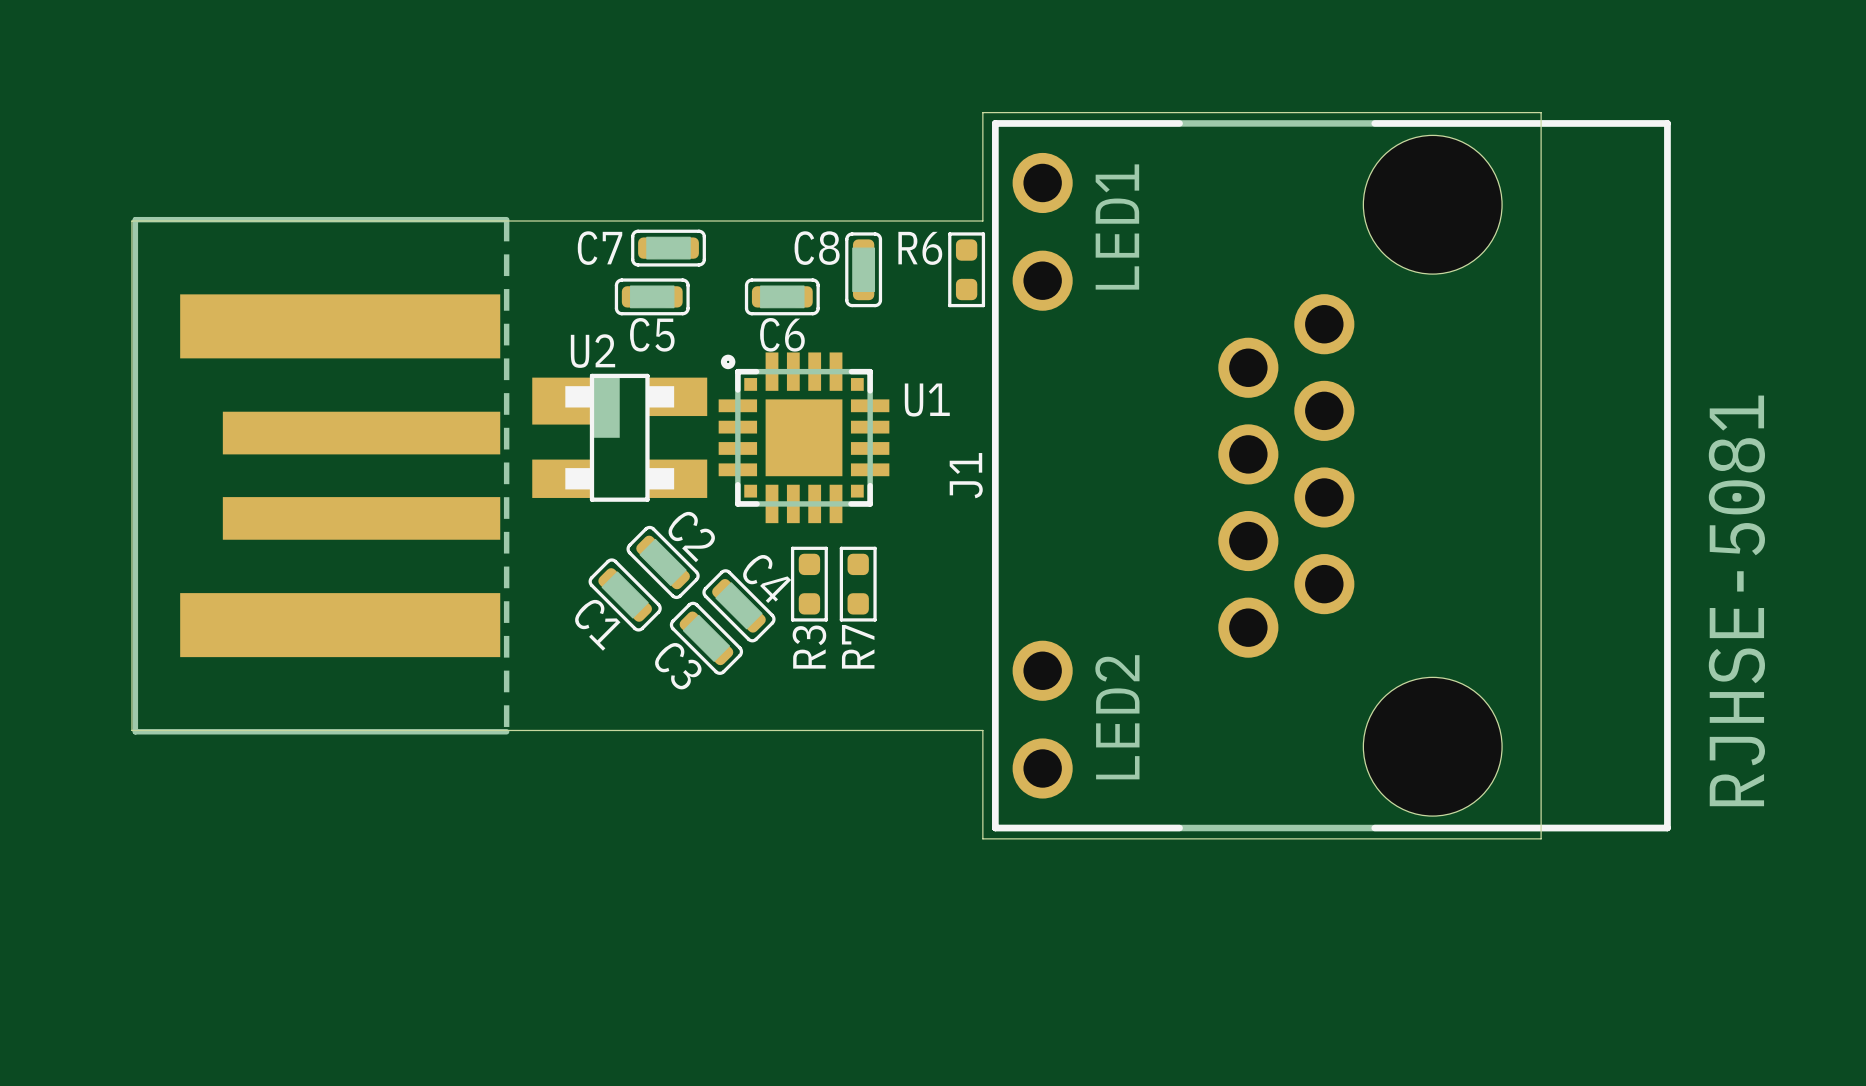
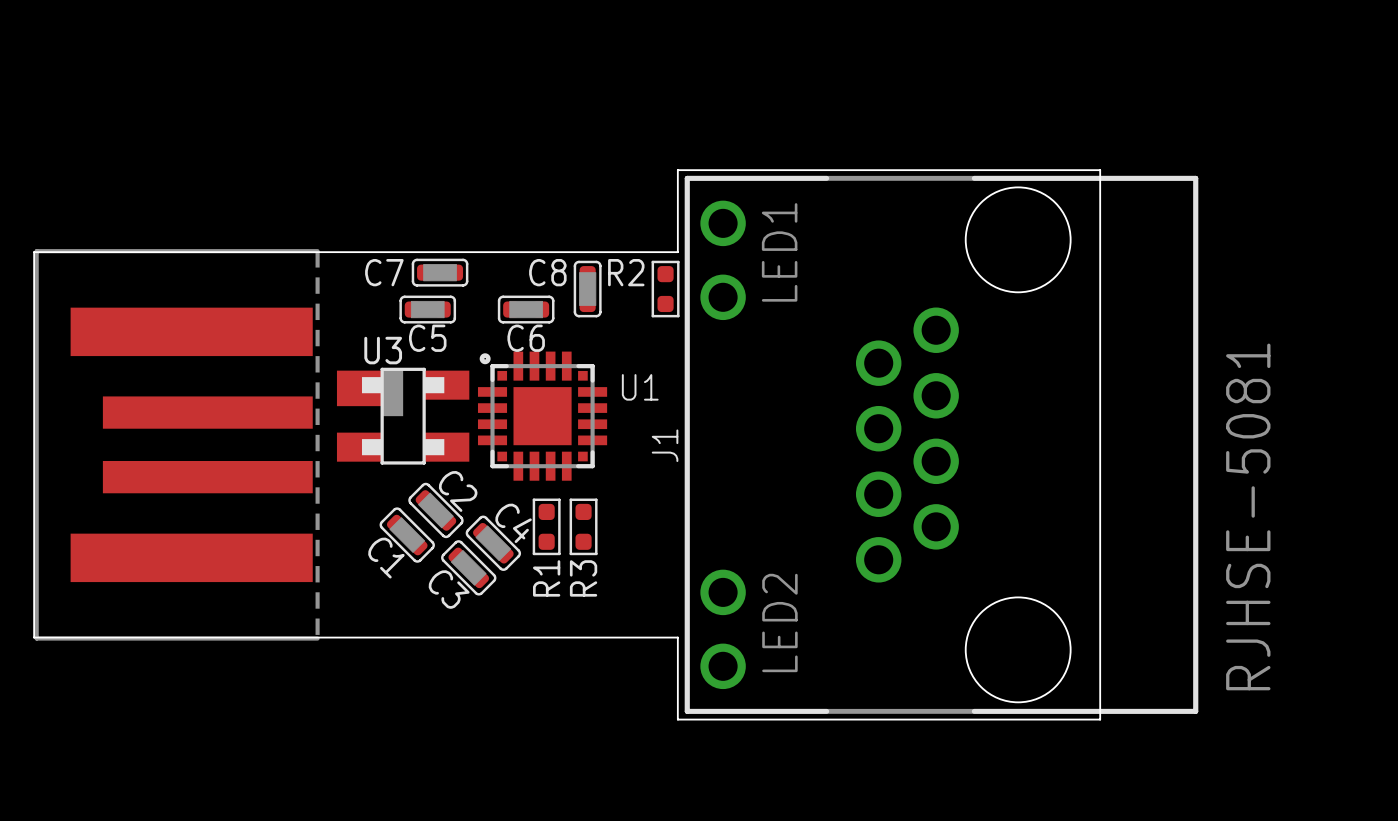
R6 name: R6 (920, 248) -> R2 (626, 272)
U2 name: U2 (592, 351) -> U3 (383, 350)
R7 name: R7 (858, 646) -> R3 (583, 578)
R3 name: R3 (809, 647) -> R1 (546, 578)

